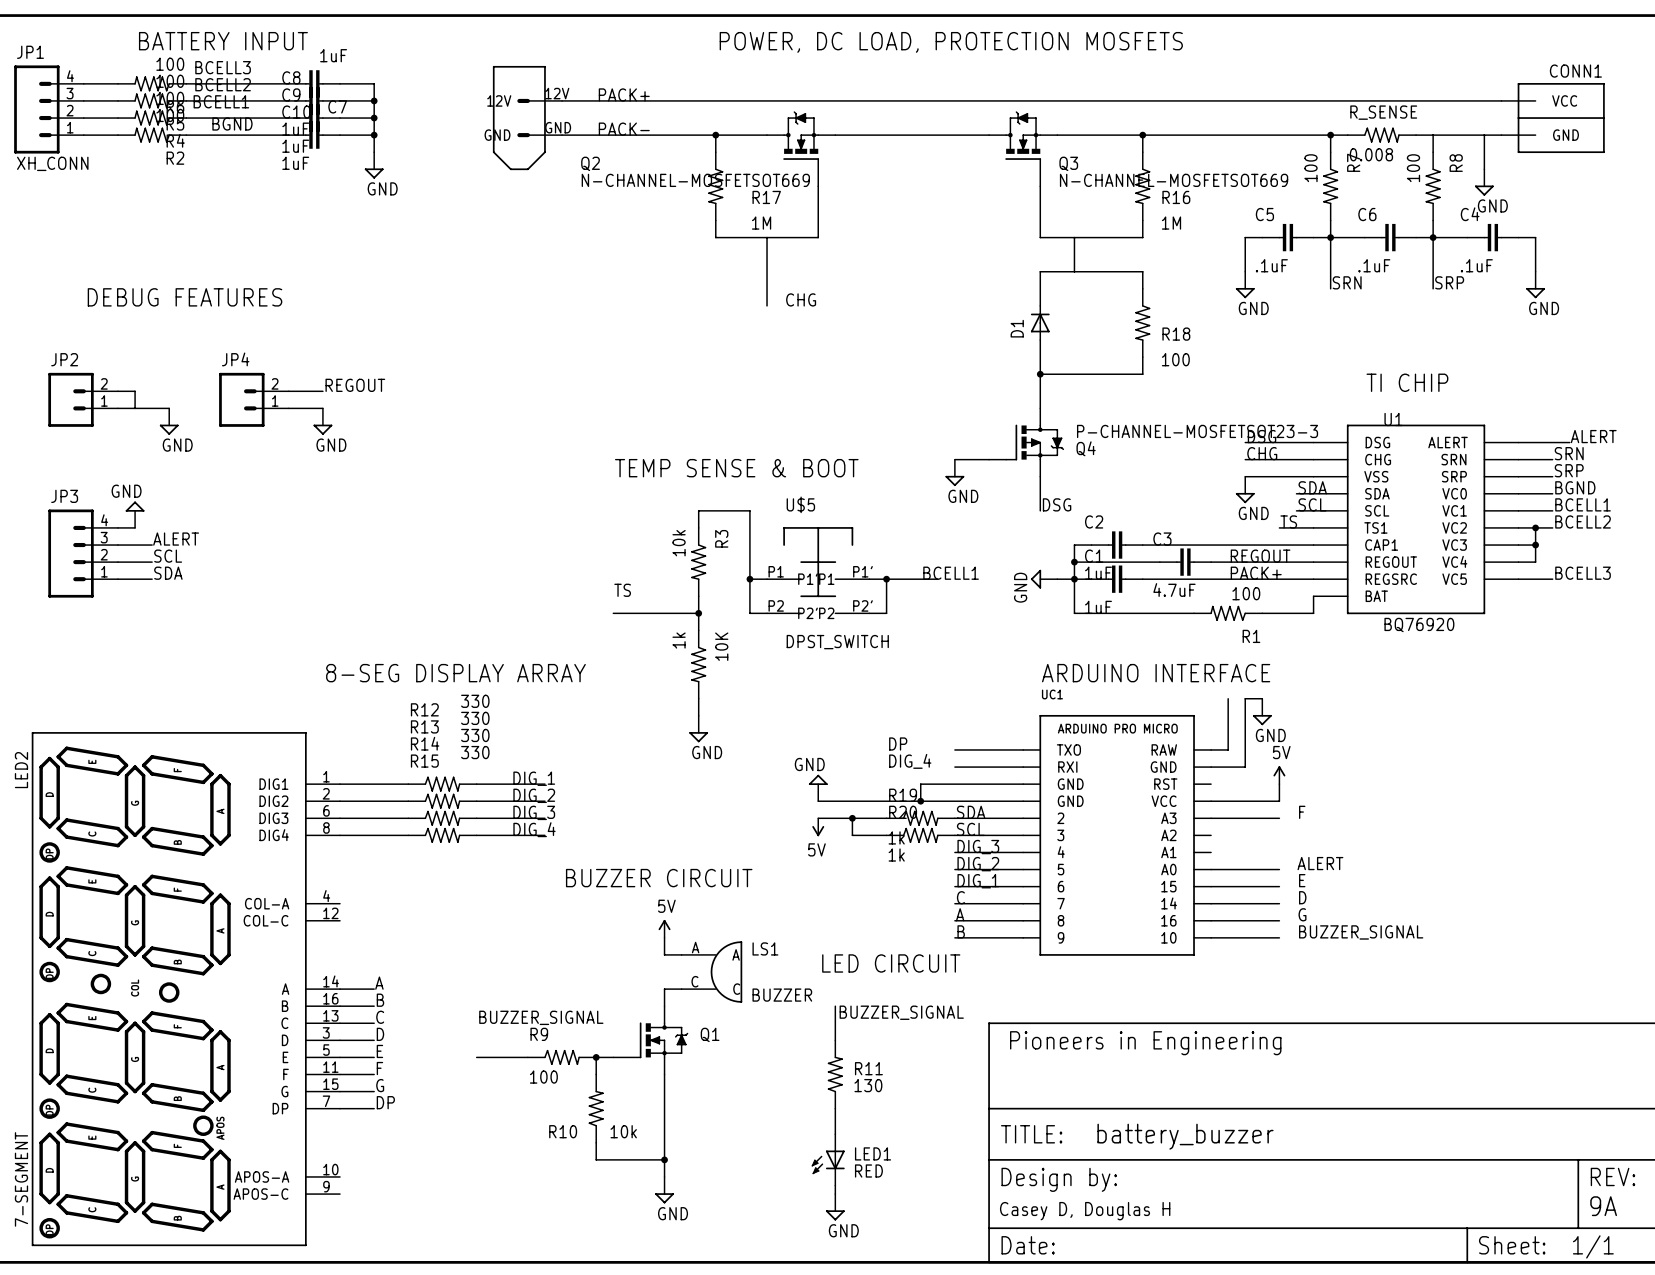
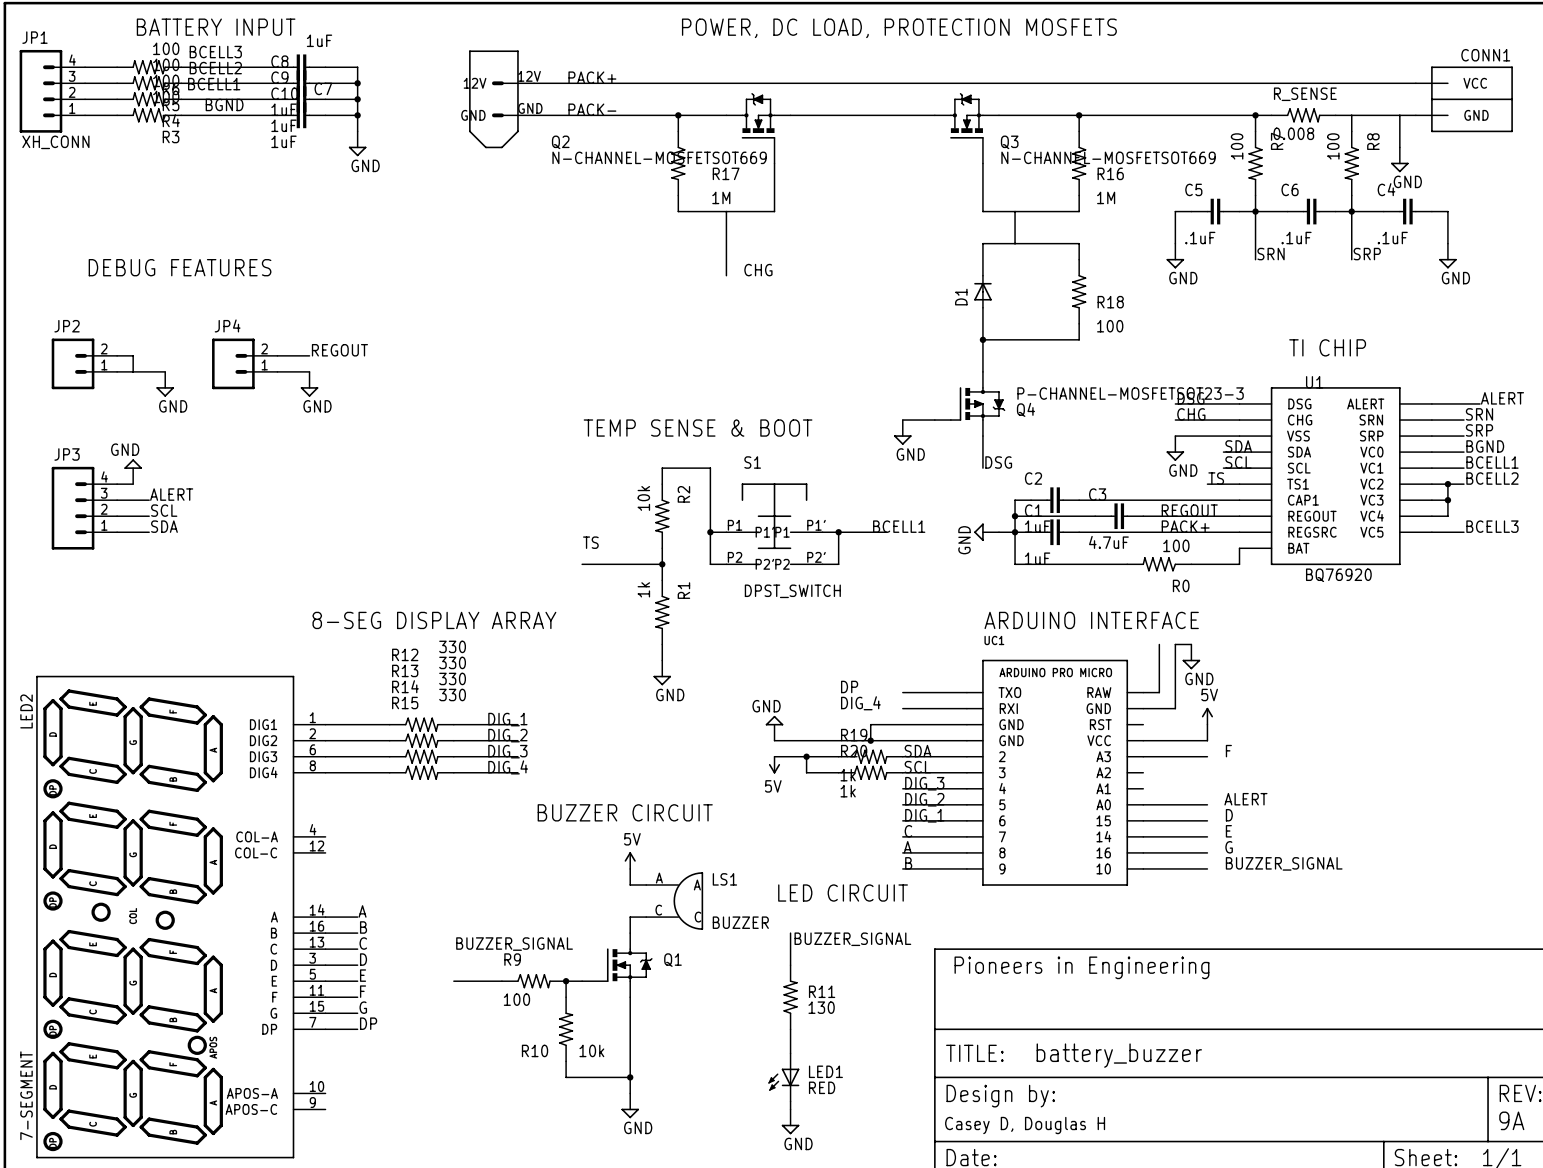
R2 name: R2 (175, 158) -> R3 (171, 137)
U$5 name: U$5 (800, 504) -> S1 (752, 462)
R3 name: R3 (721, 538) -> R2 (683, 494)
R1 name: R1 (1251, 636) -> R0 (1181, 585)
10K name: 10K (721, 646) -> R1 (683, 590)
label: E (1302, 880) -> D (1229, 815)
label: D (1302, 897) -> E (1228, 831)

